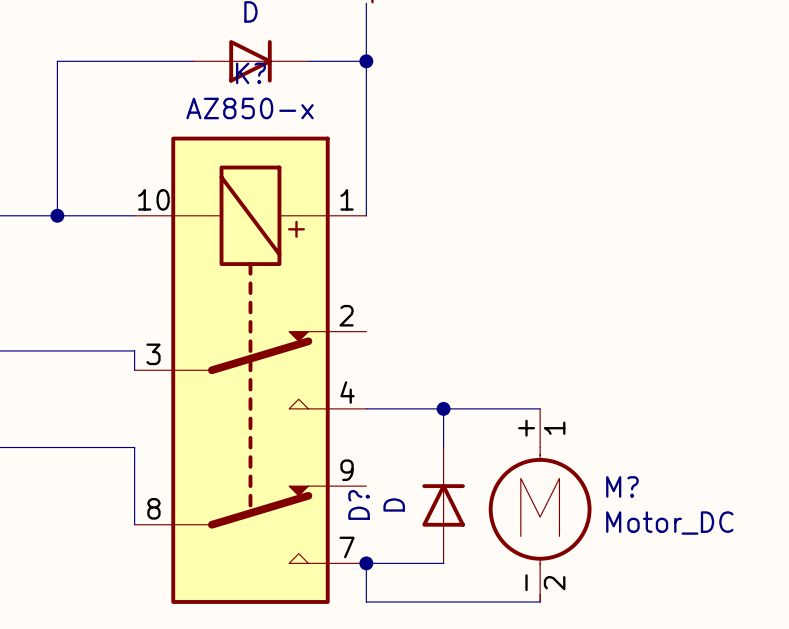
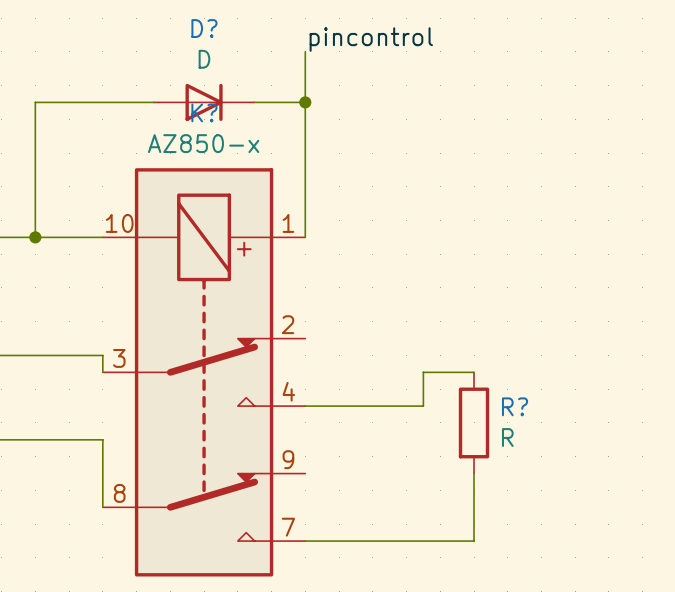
wire: (443, 408) (443, 447) -> none
junction: (443, 408) -> none
wire: (501, 408) (540, 408) -> (423, 406) (423, 372) (474, 372)
R?: none -> R (474, 422)
wire: none -> (474, 473) (474, 541) (372, 541)
D?: D (443, 505) -> none
M?: Motor_DC (540, 505) -> none
wire: (366, 563) (366, 601) (540, 601) -> none
junction: (366, 563) -> none

